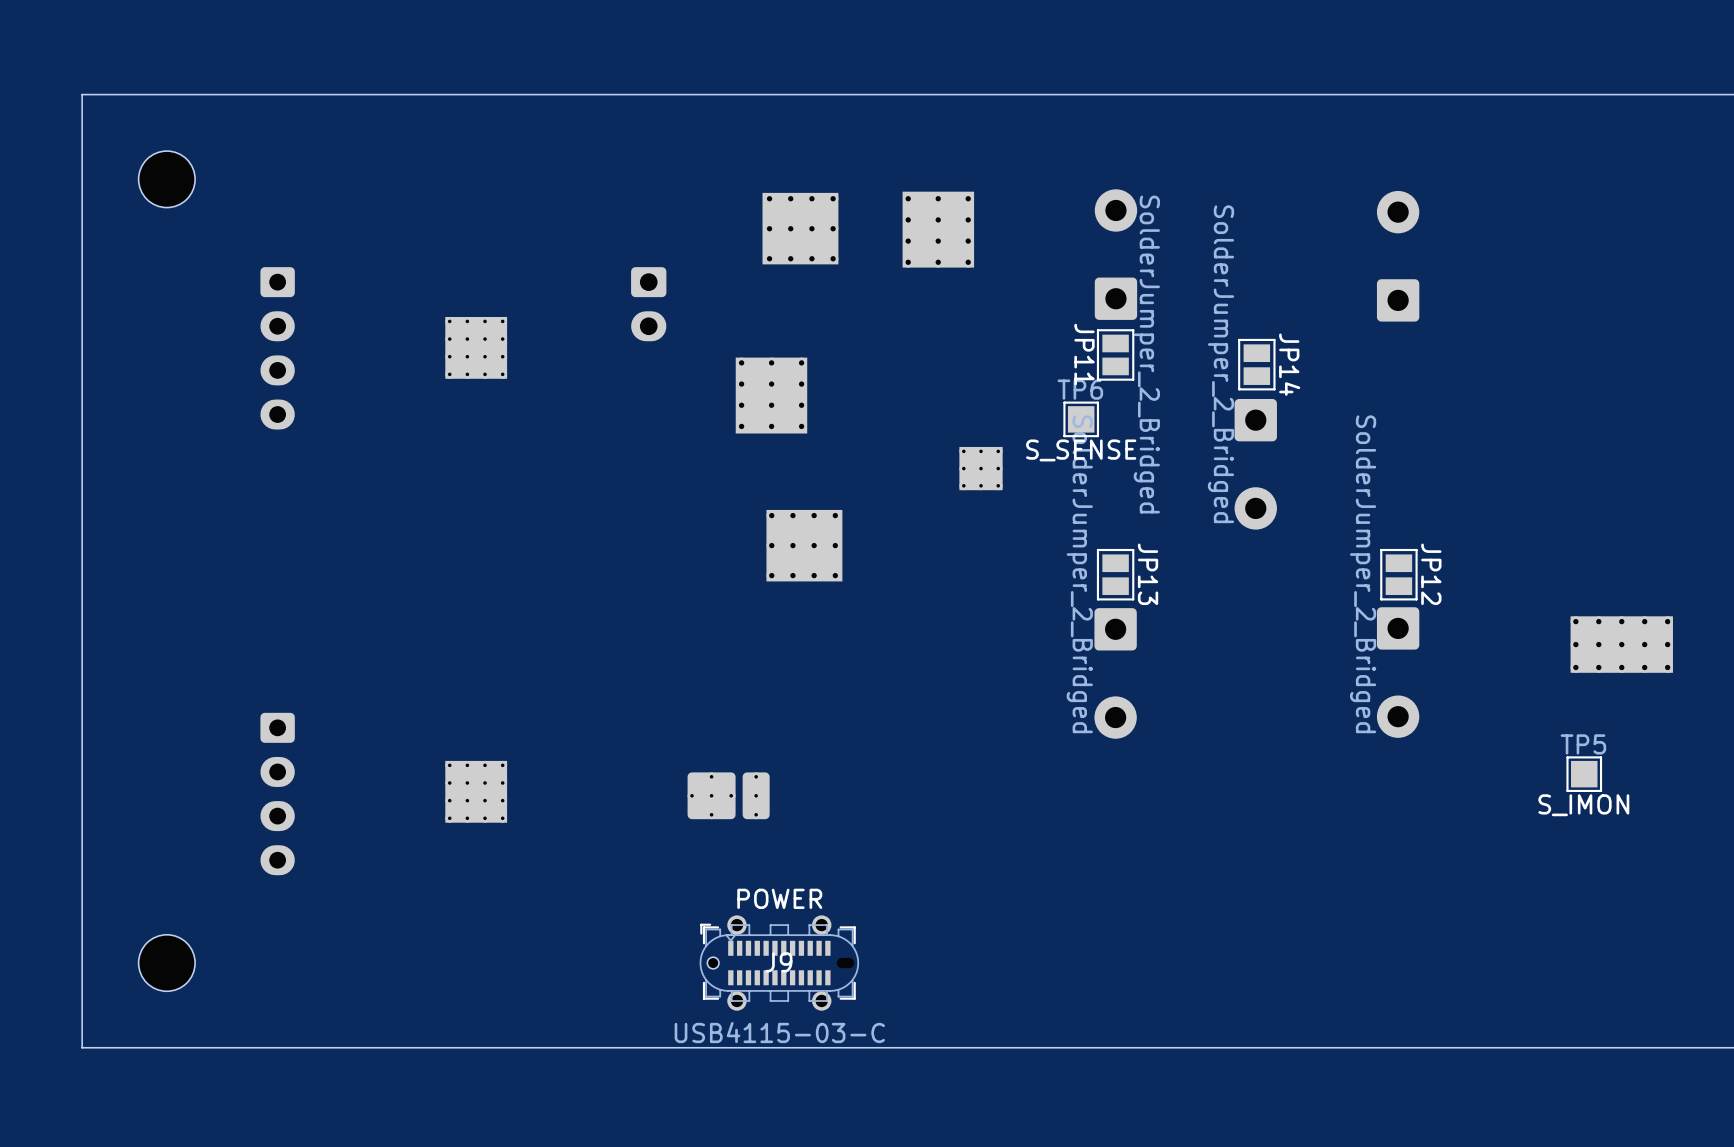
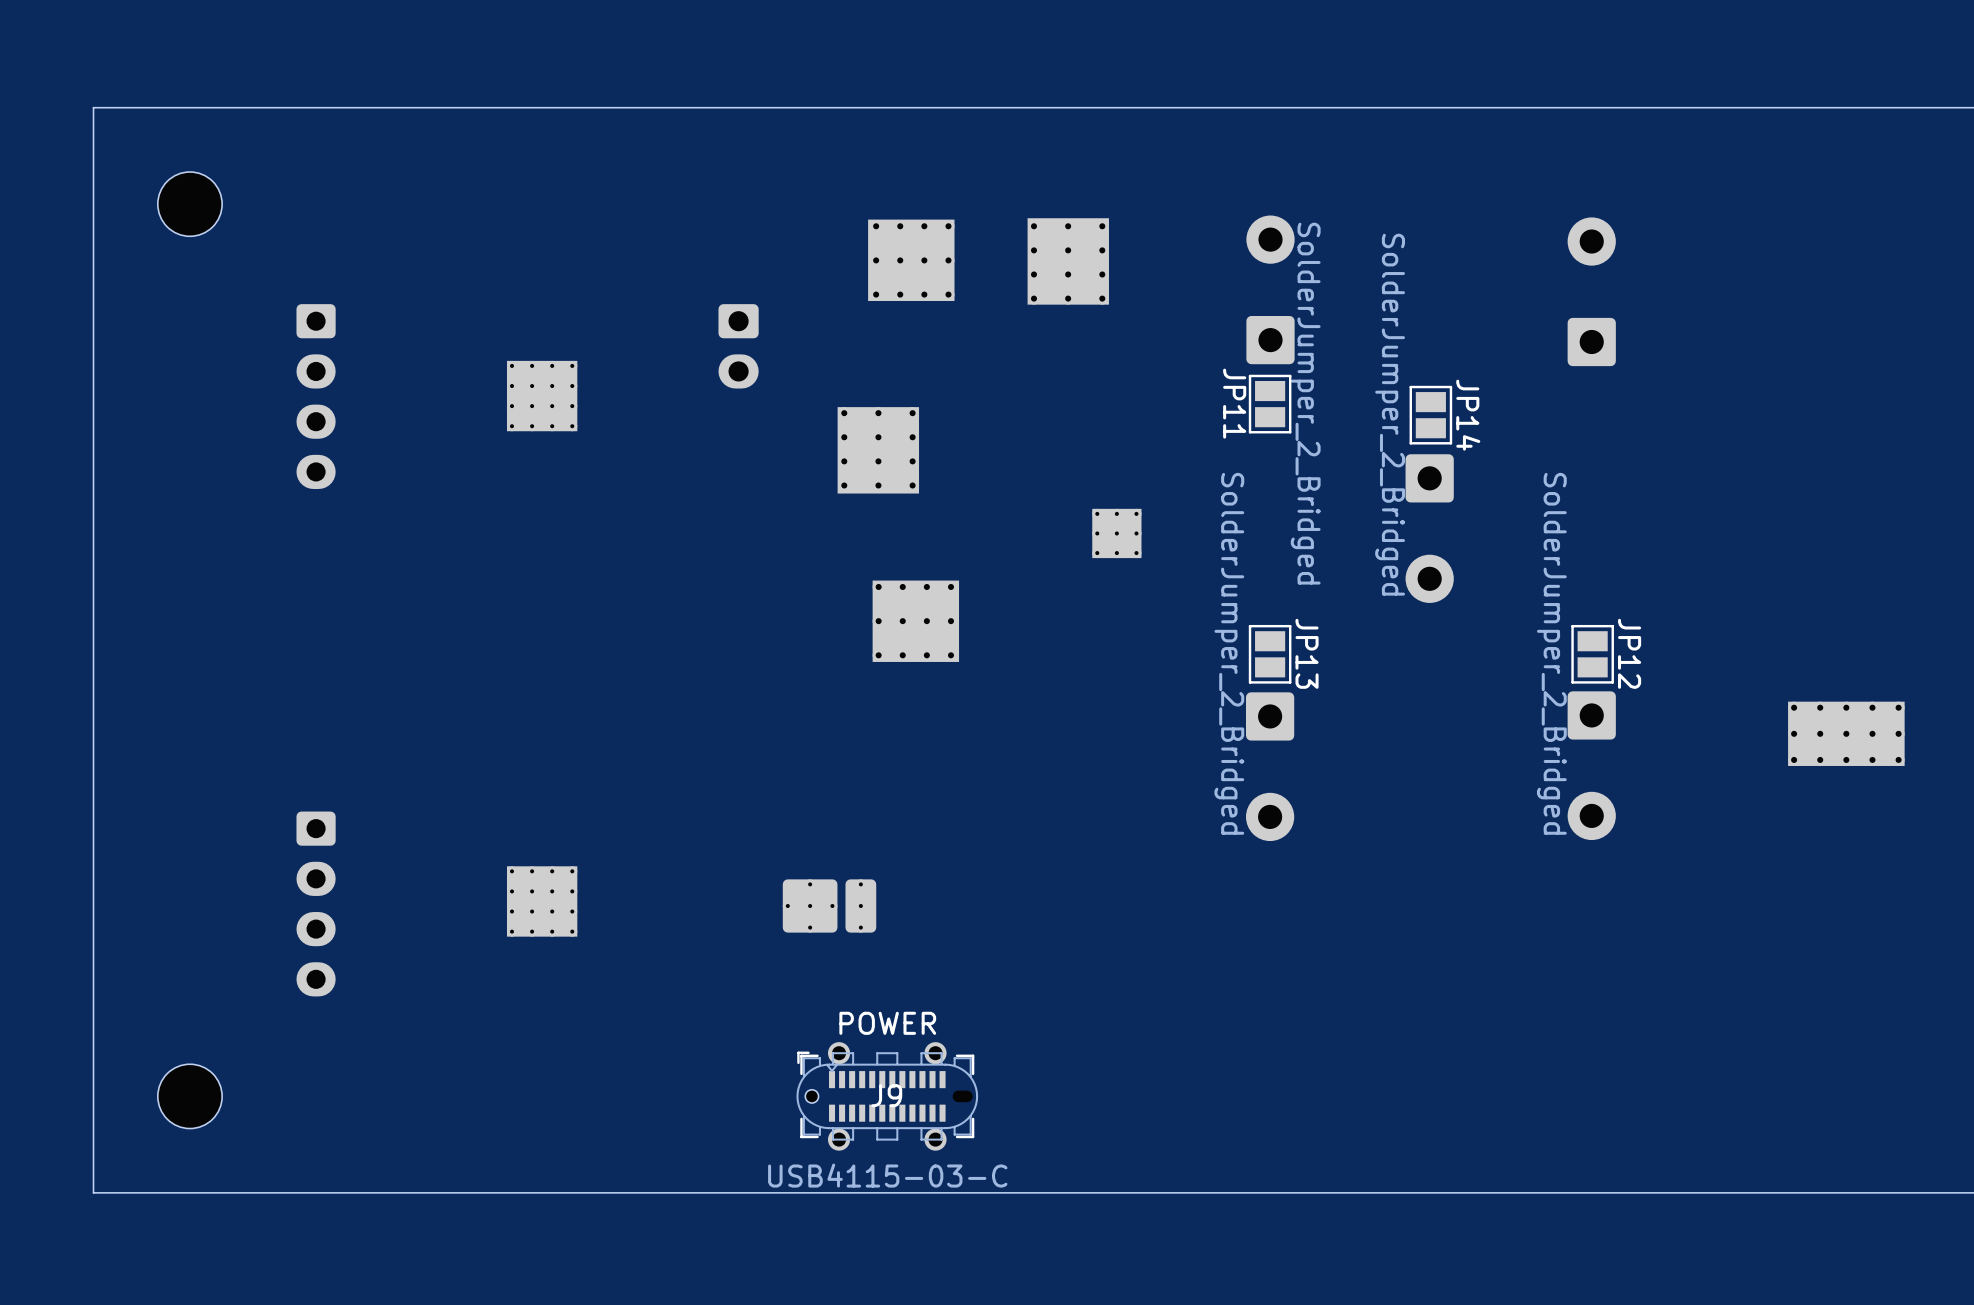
TP6: S_SENSE (1081, 419) -> none
TP5: S_IMON (1584, 774) -> none

